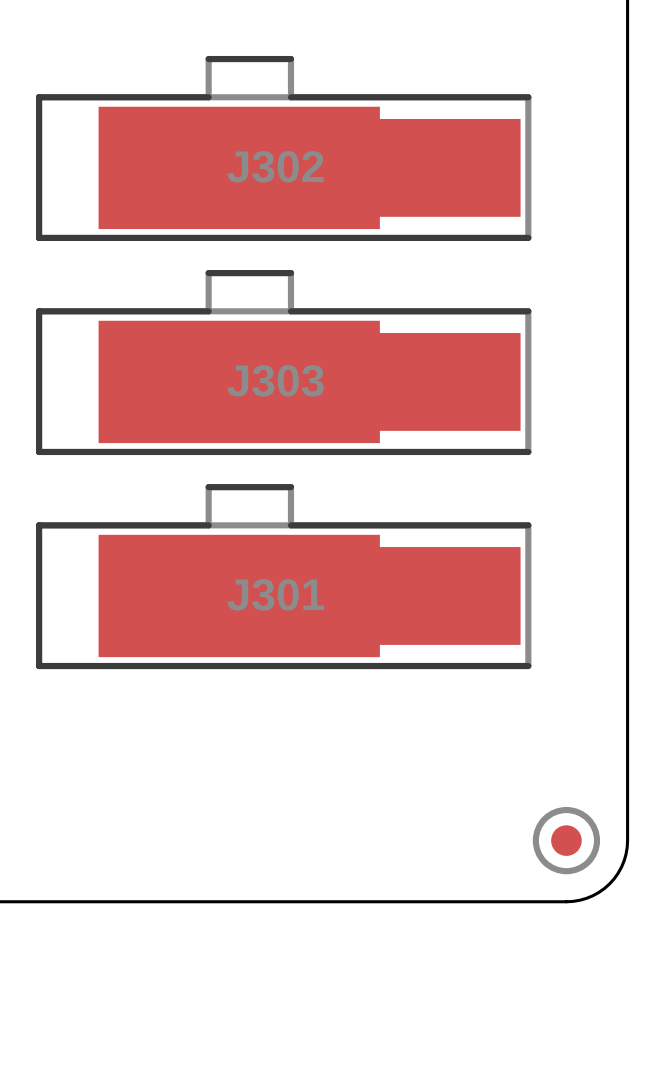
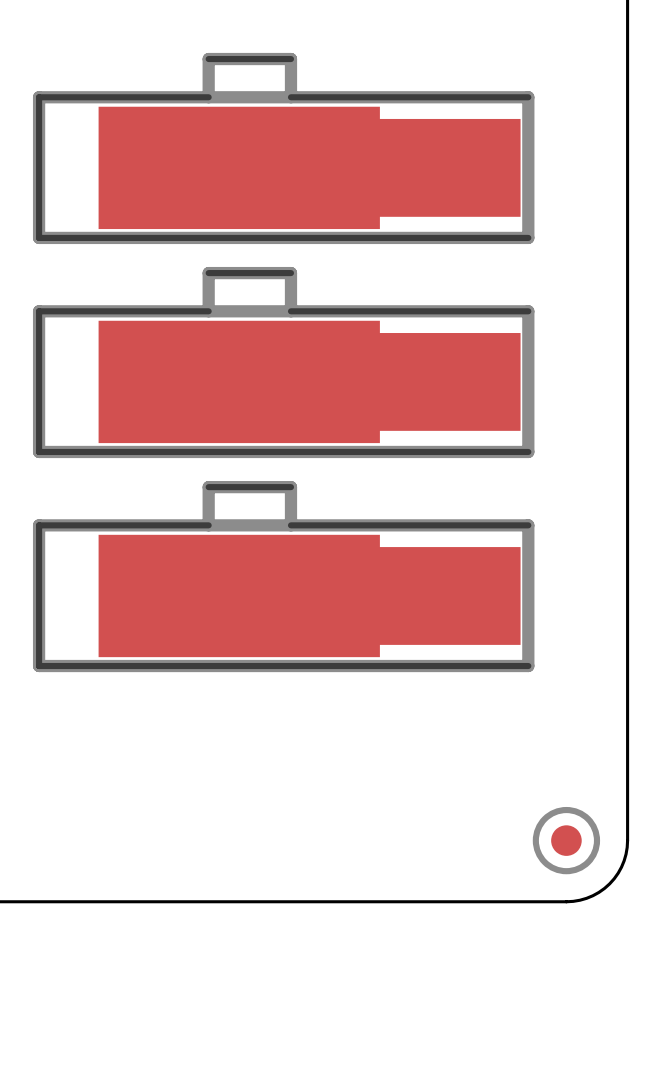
part: (283, 148) -> none
part: none -> (283, 148)
part: (283, 362) -> none
part: none -> (283, 362)
part: (283, 576) -> none
part: none -> (283, 576)

